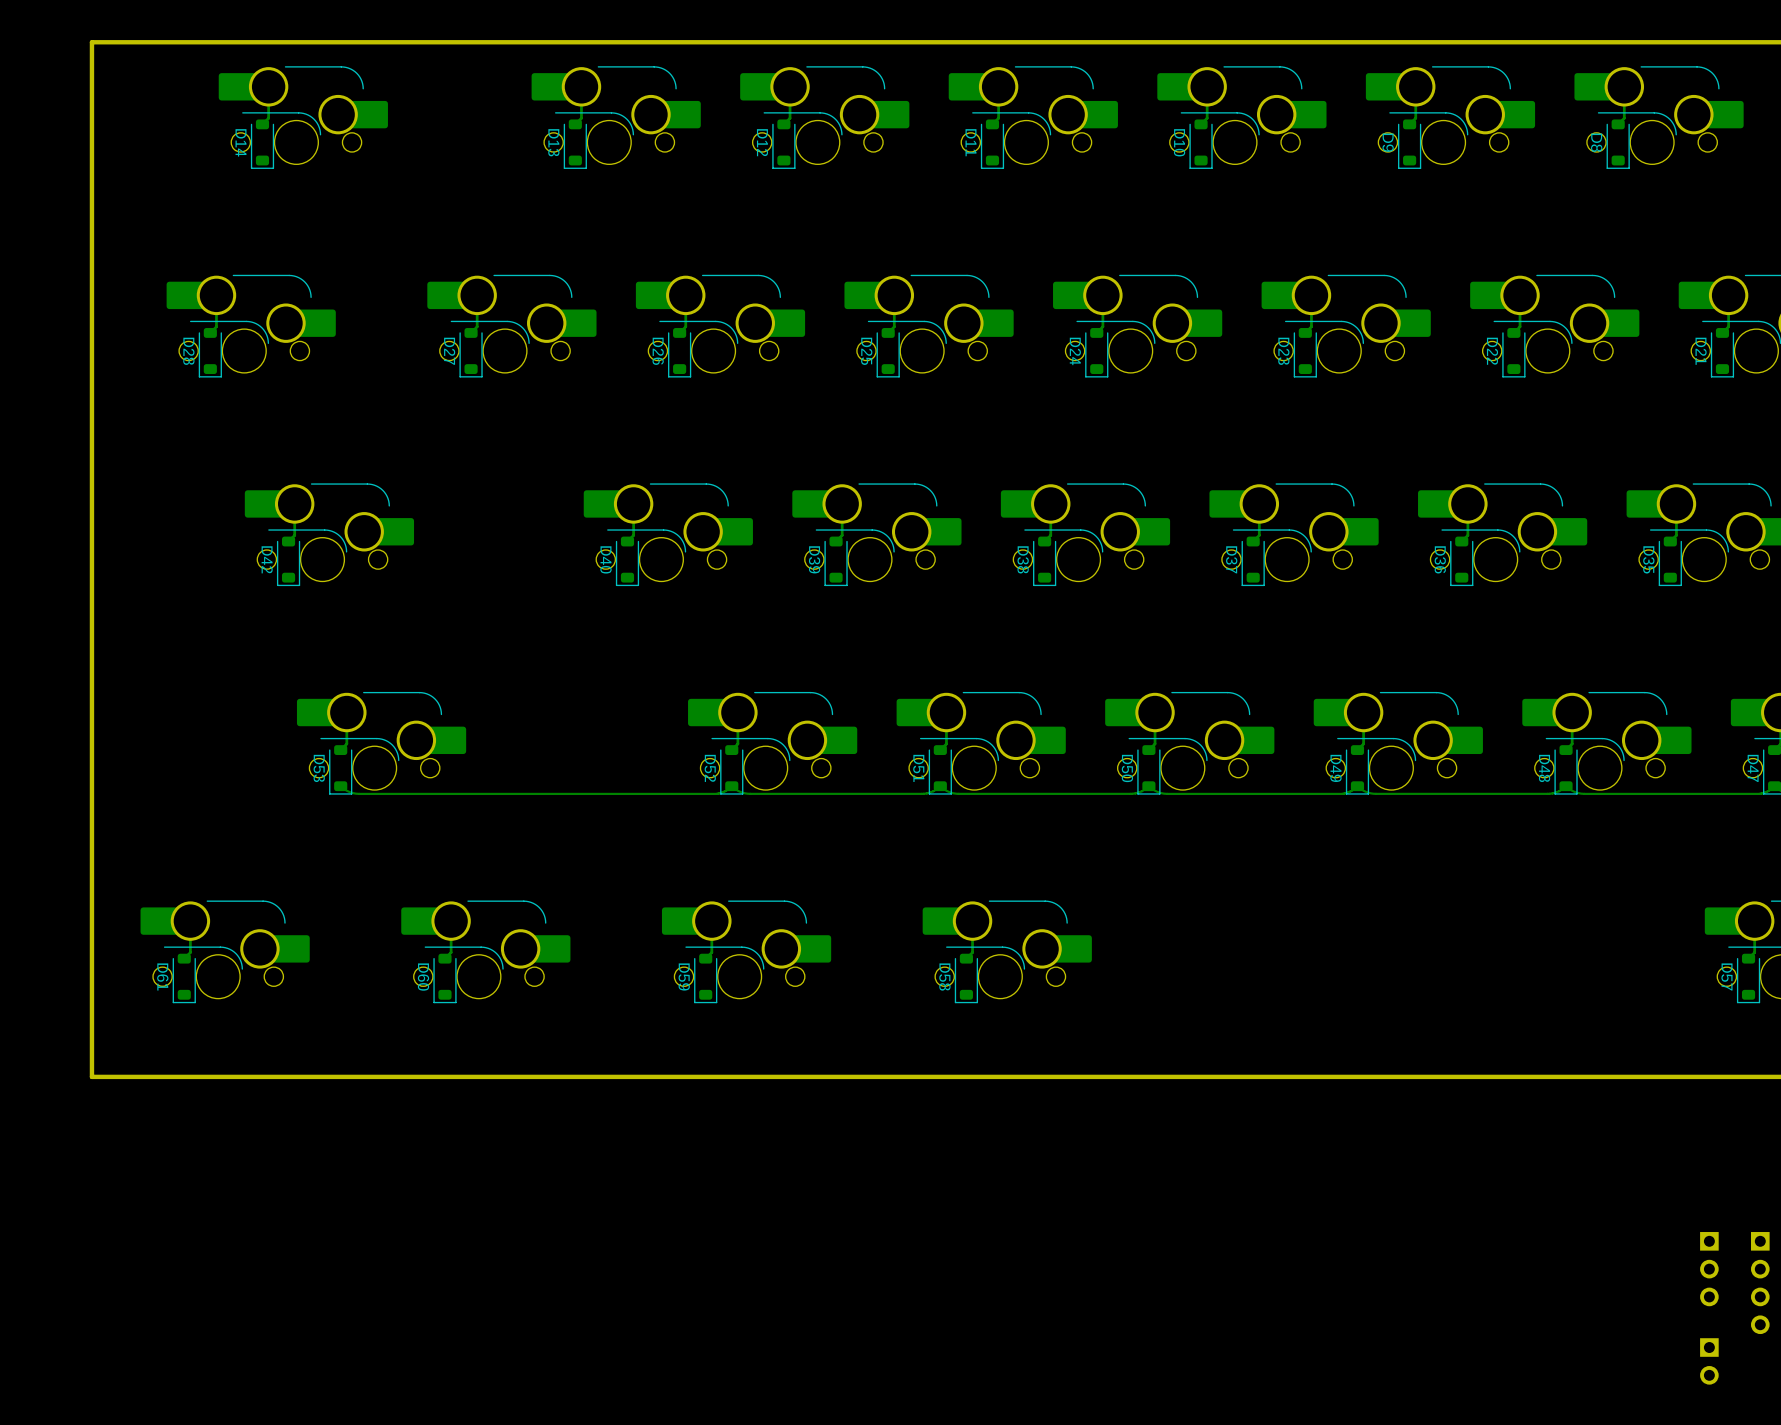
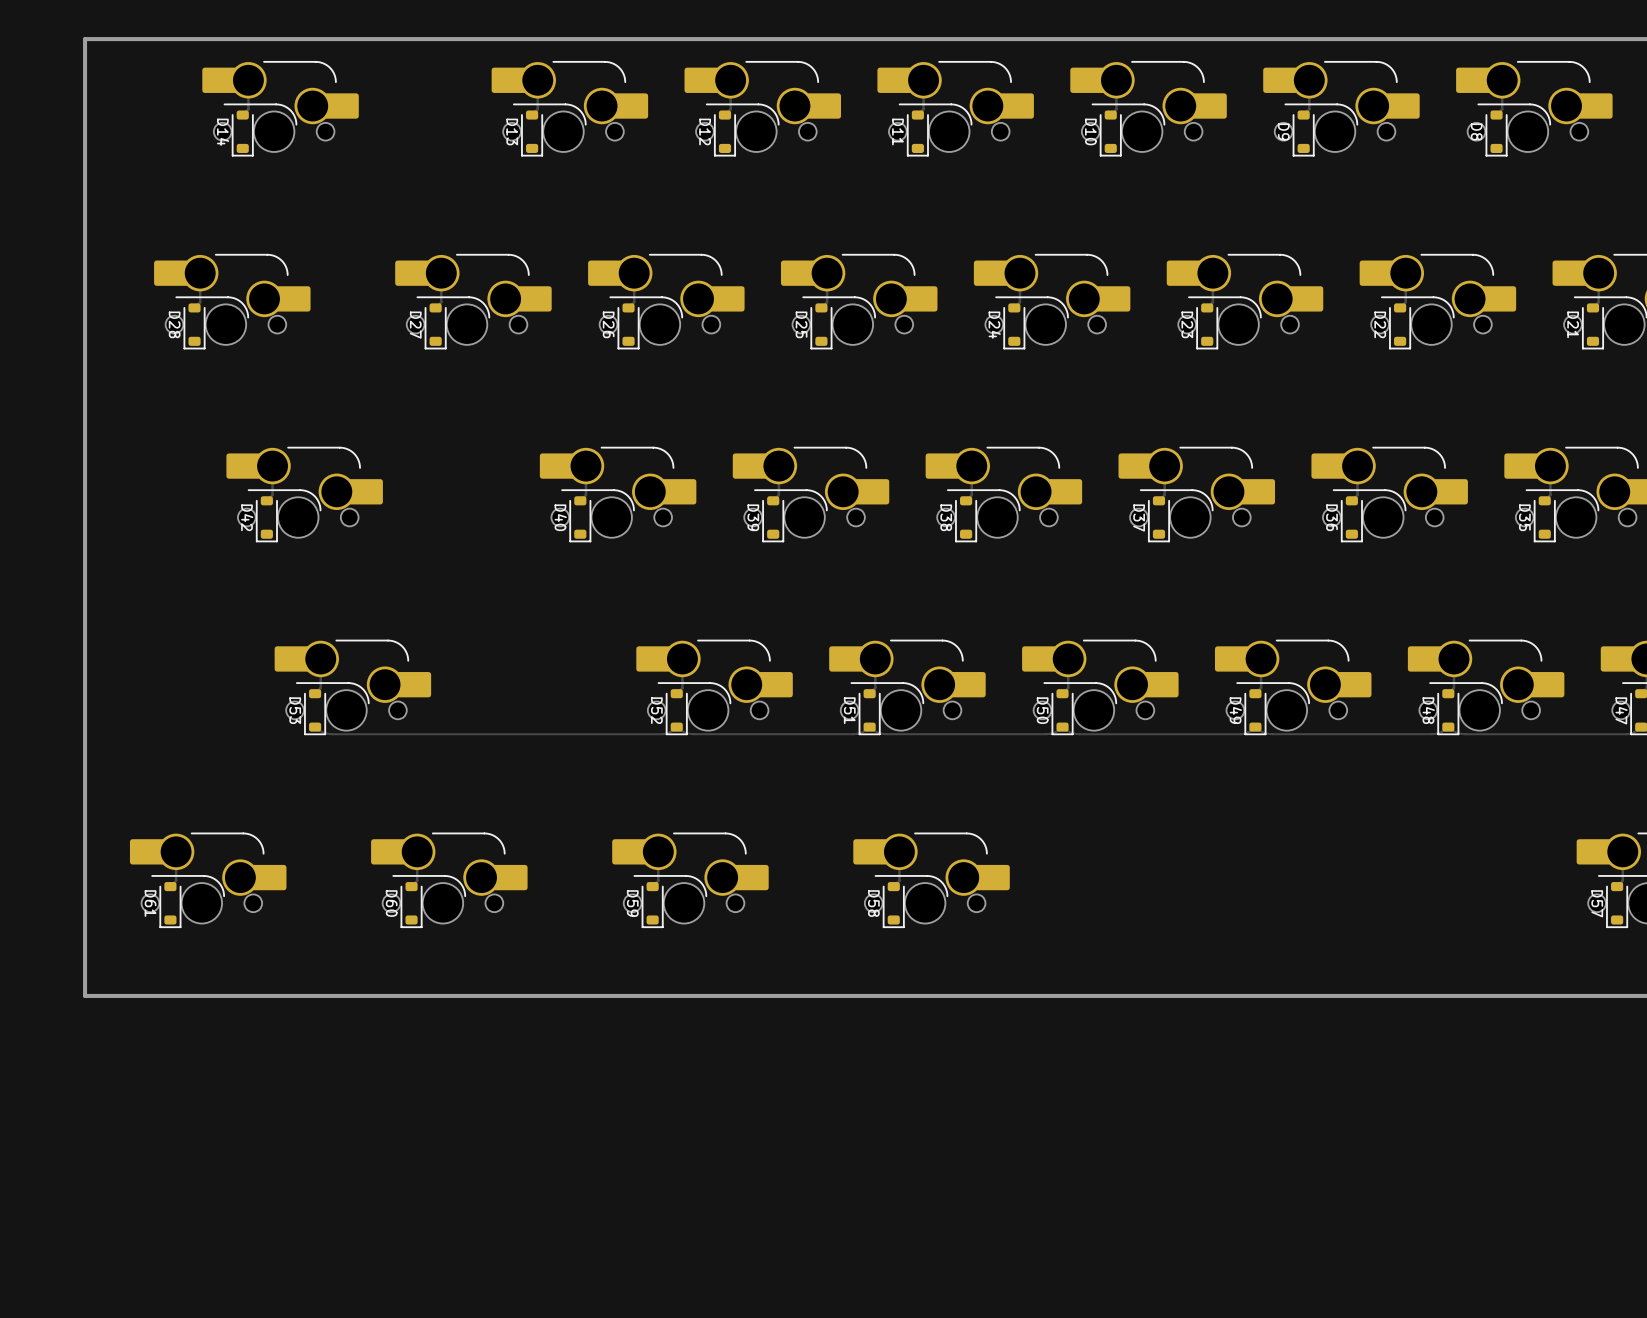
part: (1709, 1269) -> none
part: (1760, 1283) -> none
part: (1709, 1361) -> none

